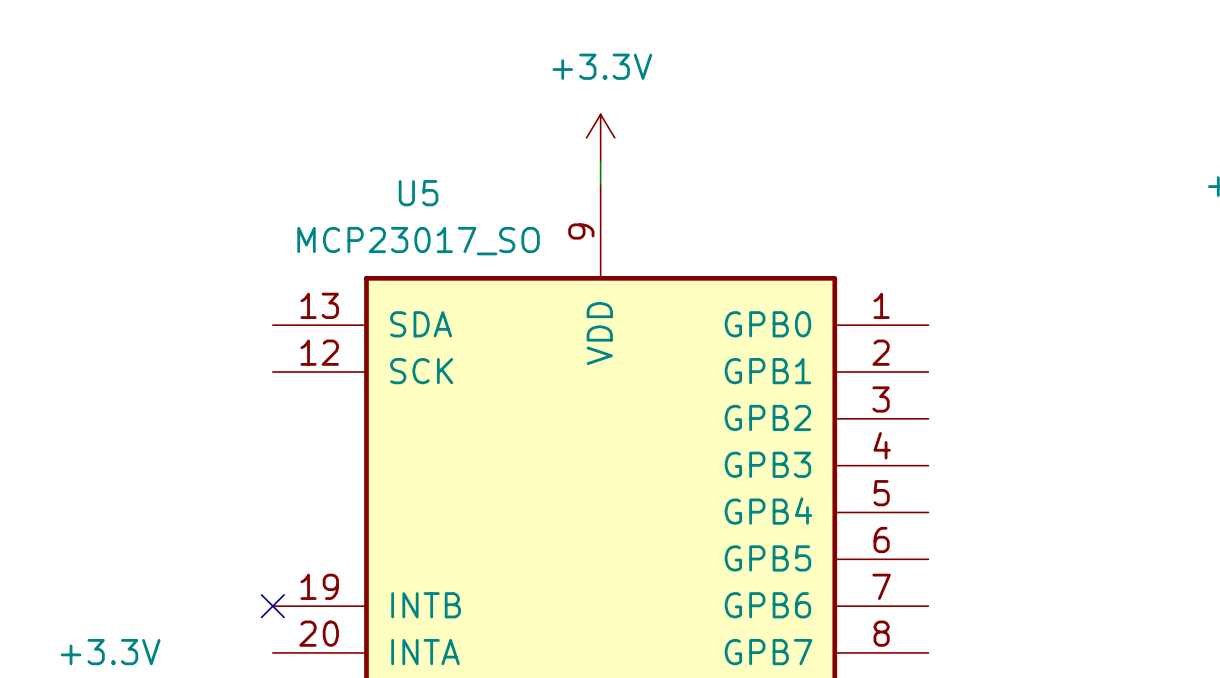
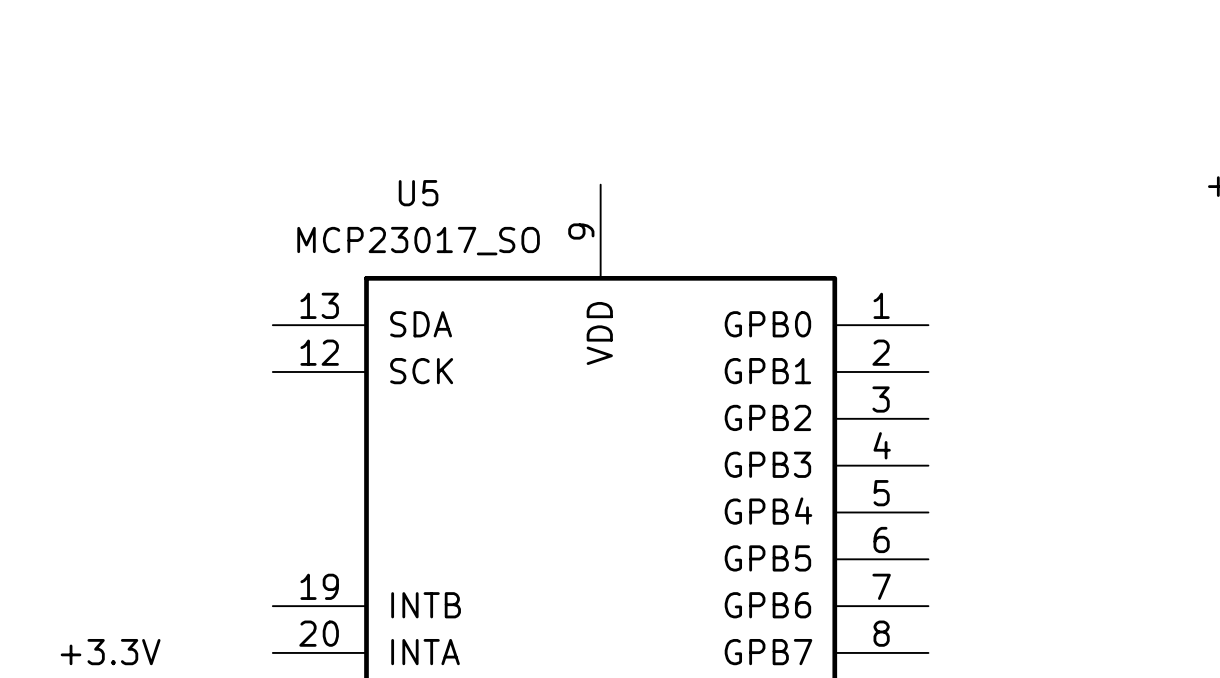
power symbol: +3.3V (600, 137) -> none
wire: (600, 161) (600, 184) -> none
no-connect mark: (272, 606) -> none

